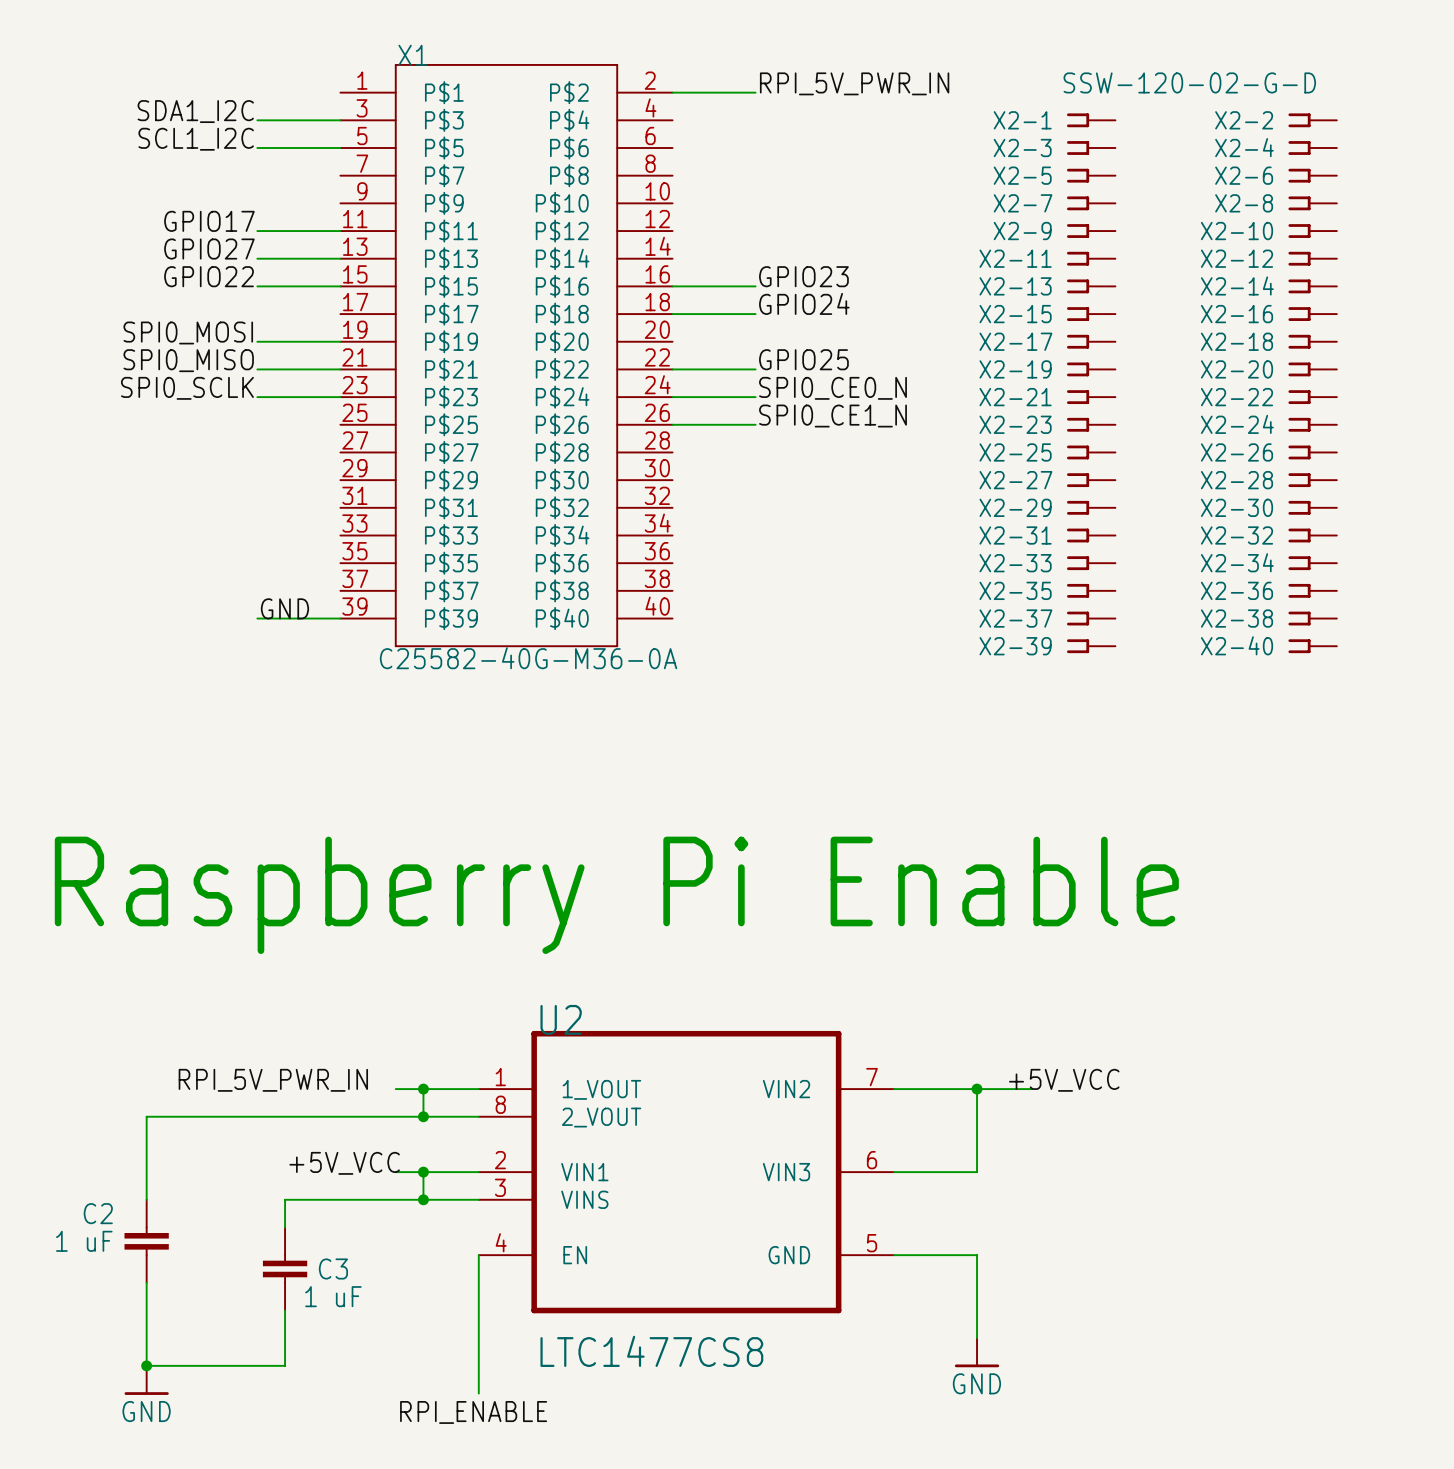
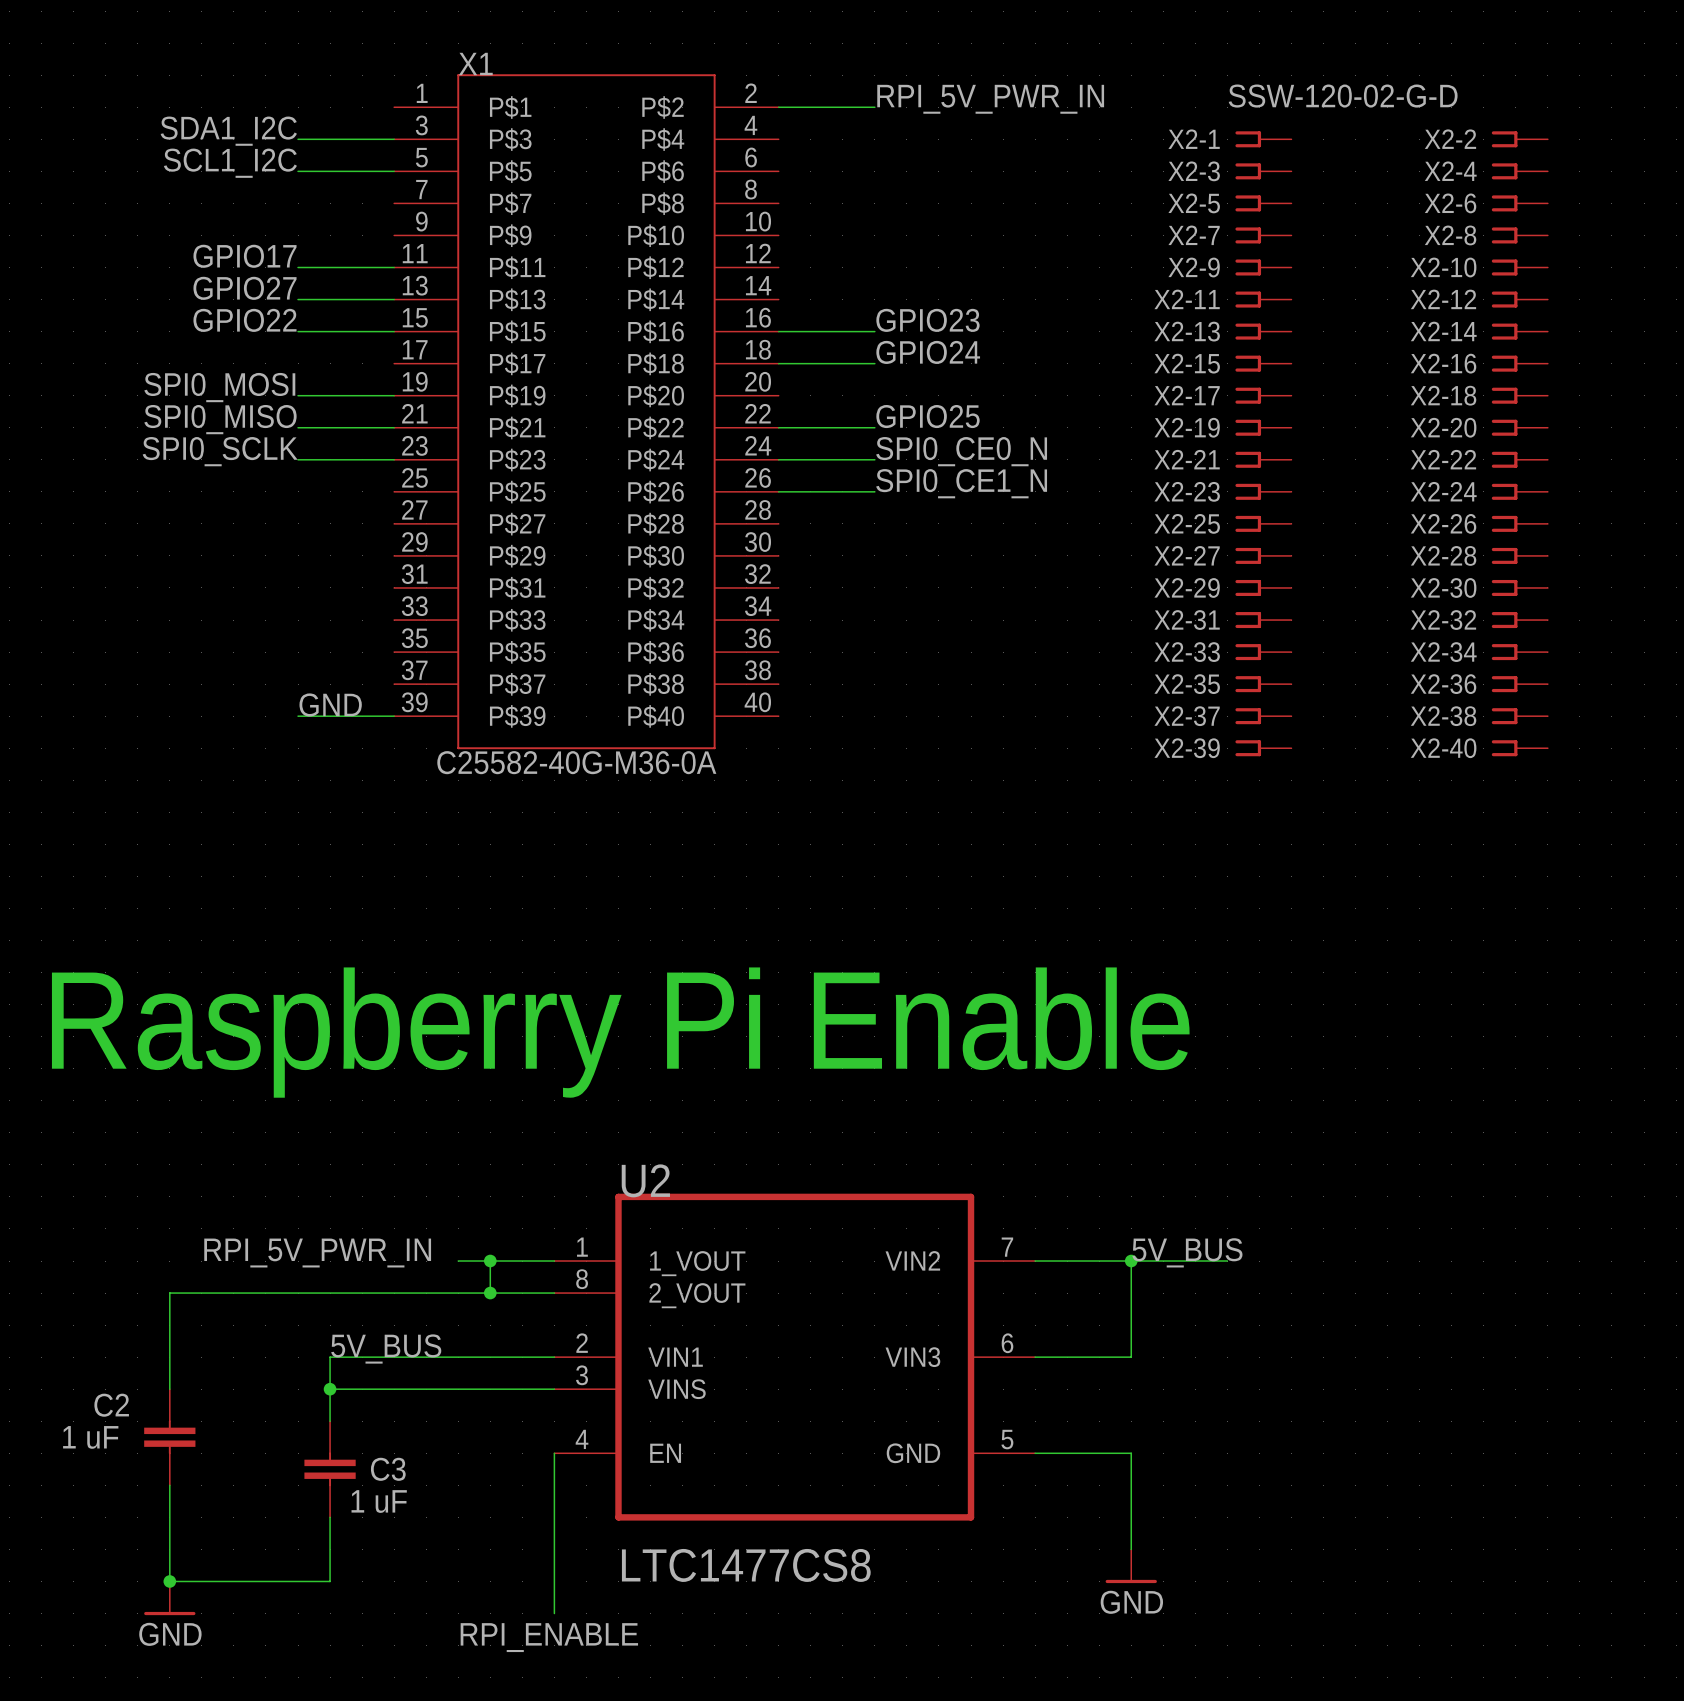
label: none -> 5V_BUS (1187, 1252)
label: +5V_VCC (1064, 1080) -> none
wire: none -> (1195, 1261) (1227, 1261)
label: +5V_VCC (344, 1163) -> 5V_BUS (386, 1349)
wire: none -> (458, 1357) (330, 1357) (330, 1389)
wire: (423, 1172) (423, 1199) -> none
junction: (423, 1172) -> none
junction: none -> (330, 1389)
junction: (423, 1199) -> none

